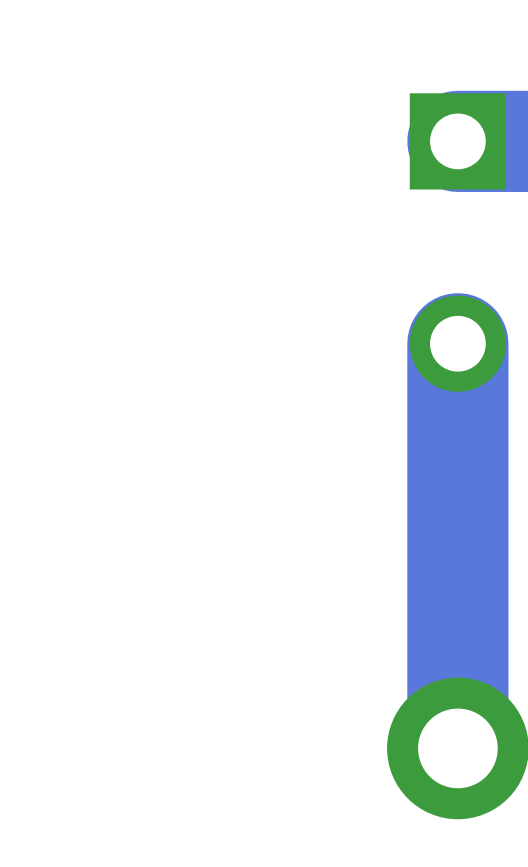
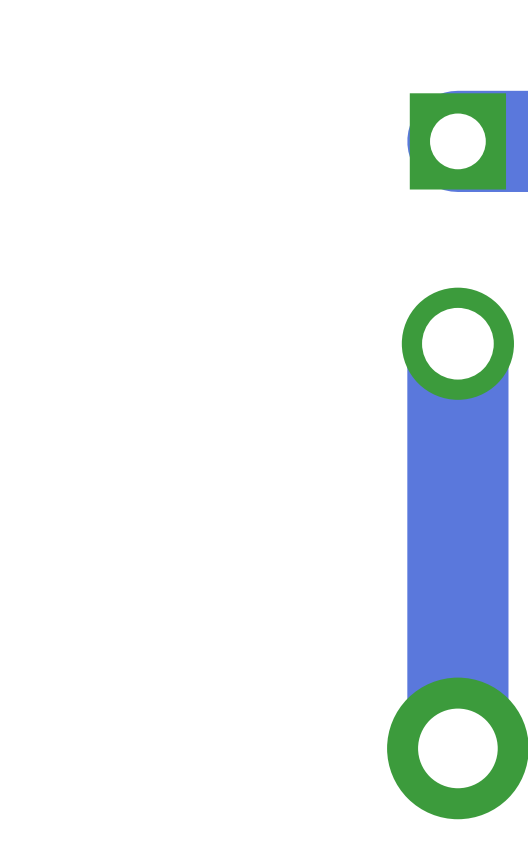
part footprint: [409, 93, 507, 392] -> [401, 93, 514, 400]

